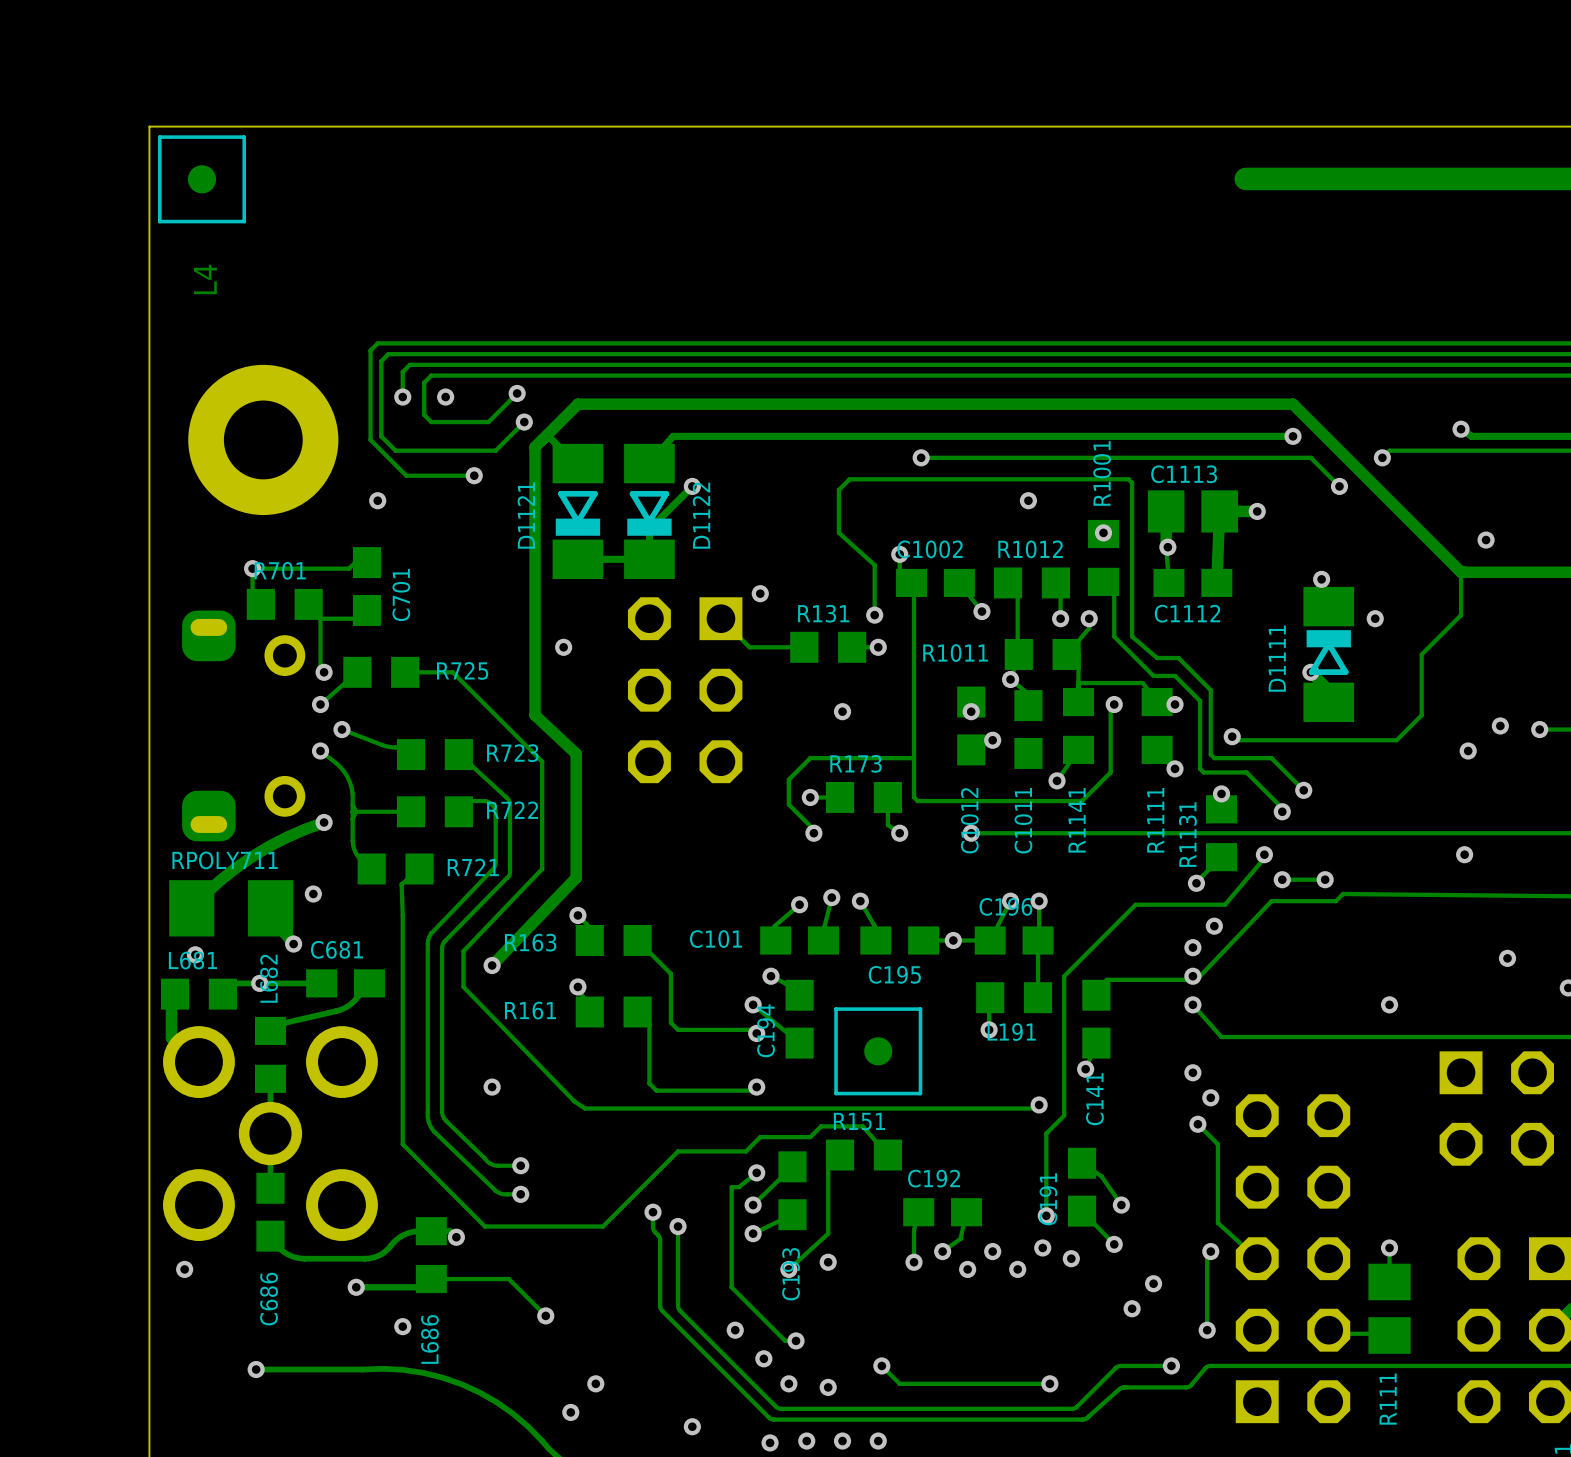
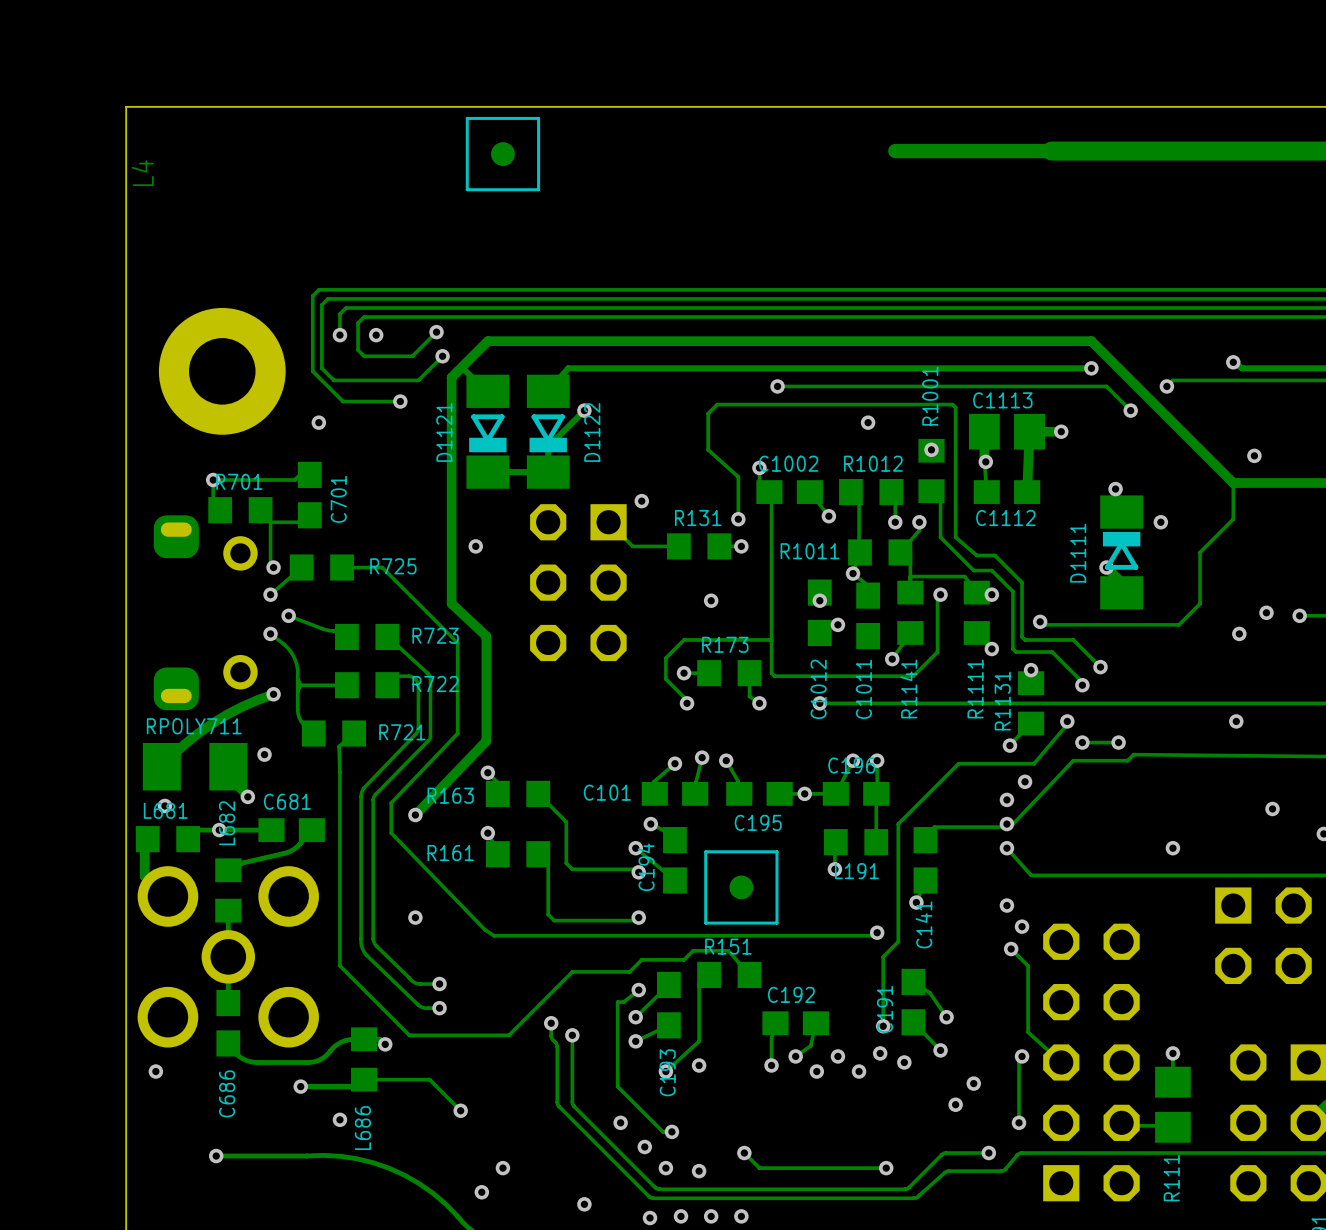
track: none -> (1051, 151) (895, 151)
drawing position: (202, 179) -> (502, 154)
text position: L4 (205, 279) -> L4 (142, 173)

